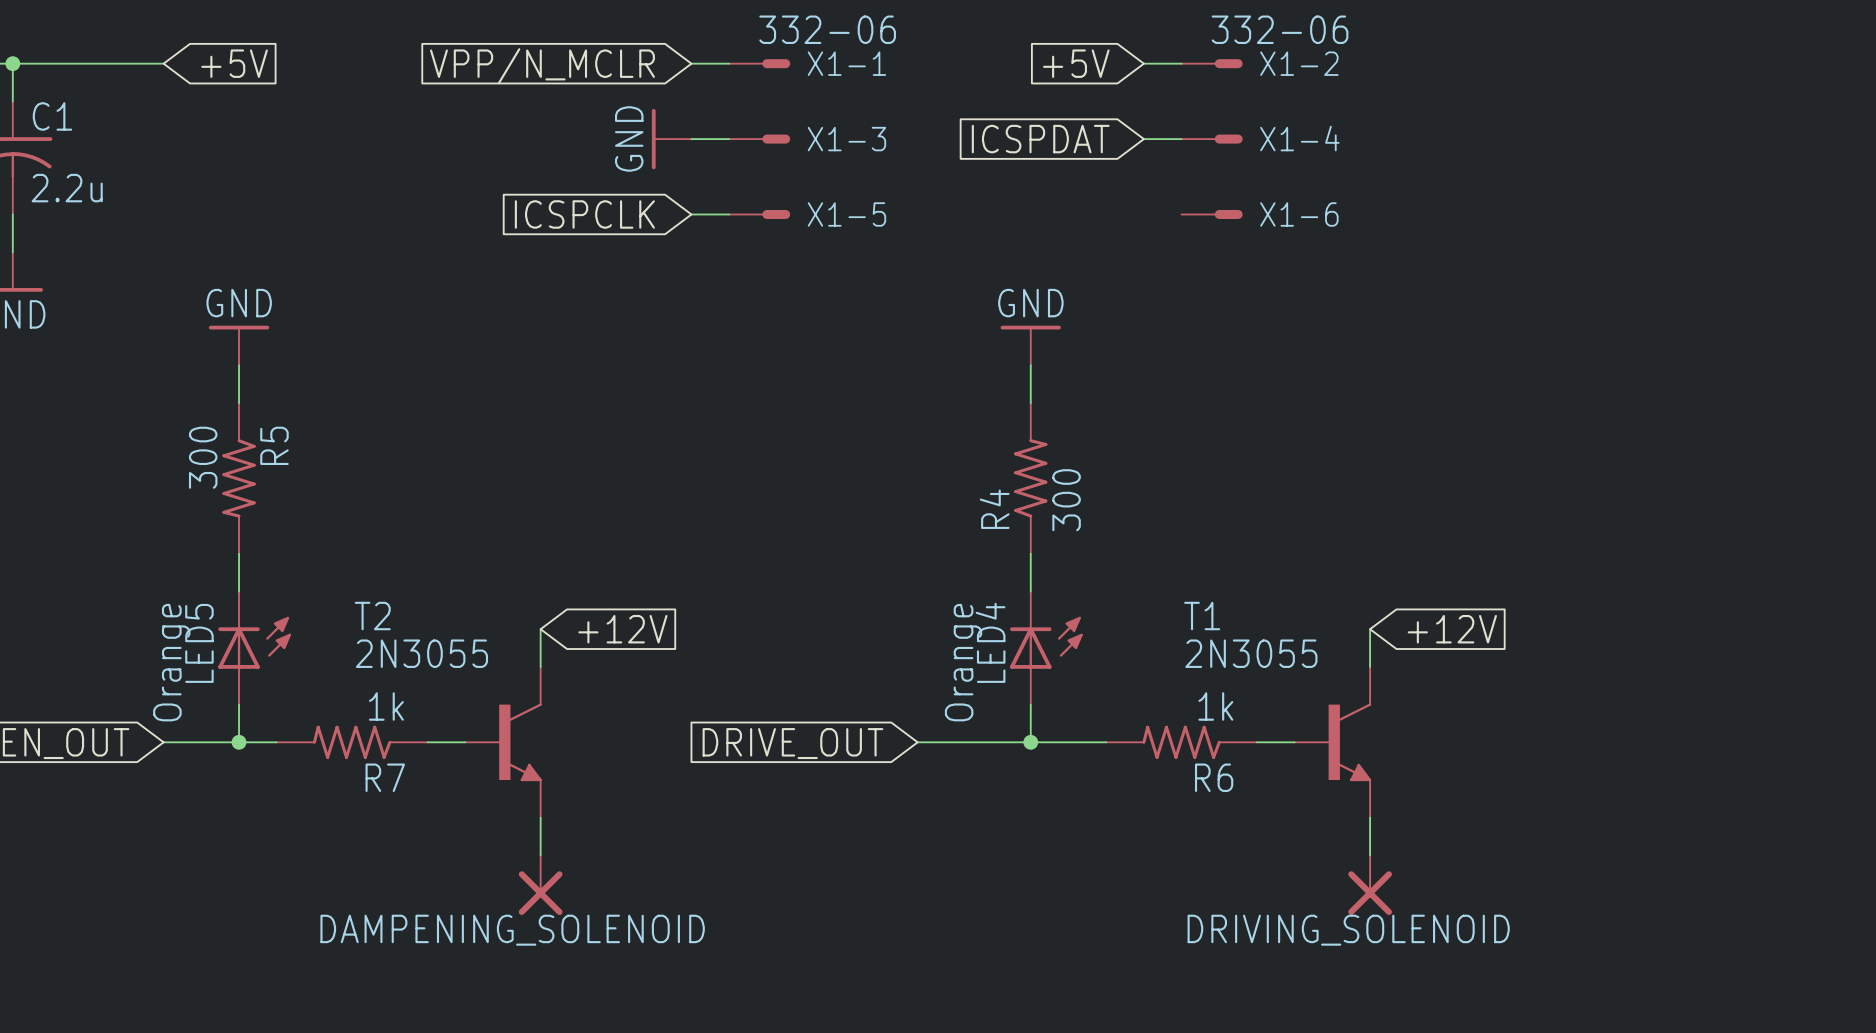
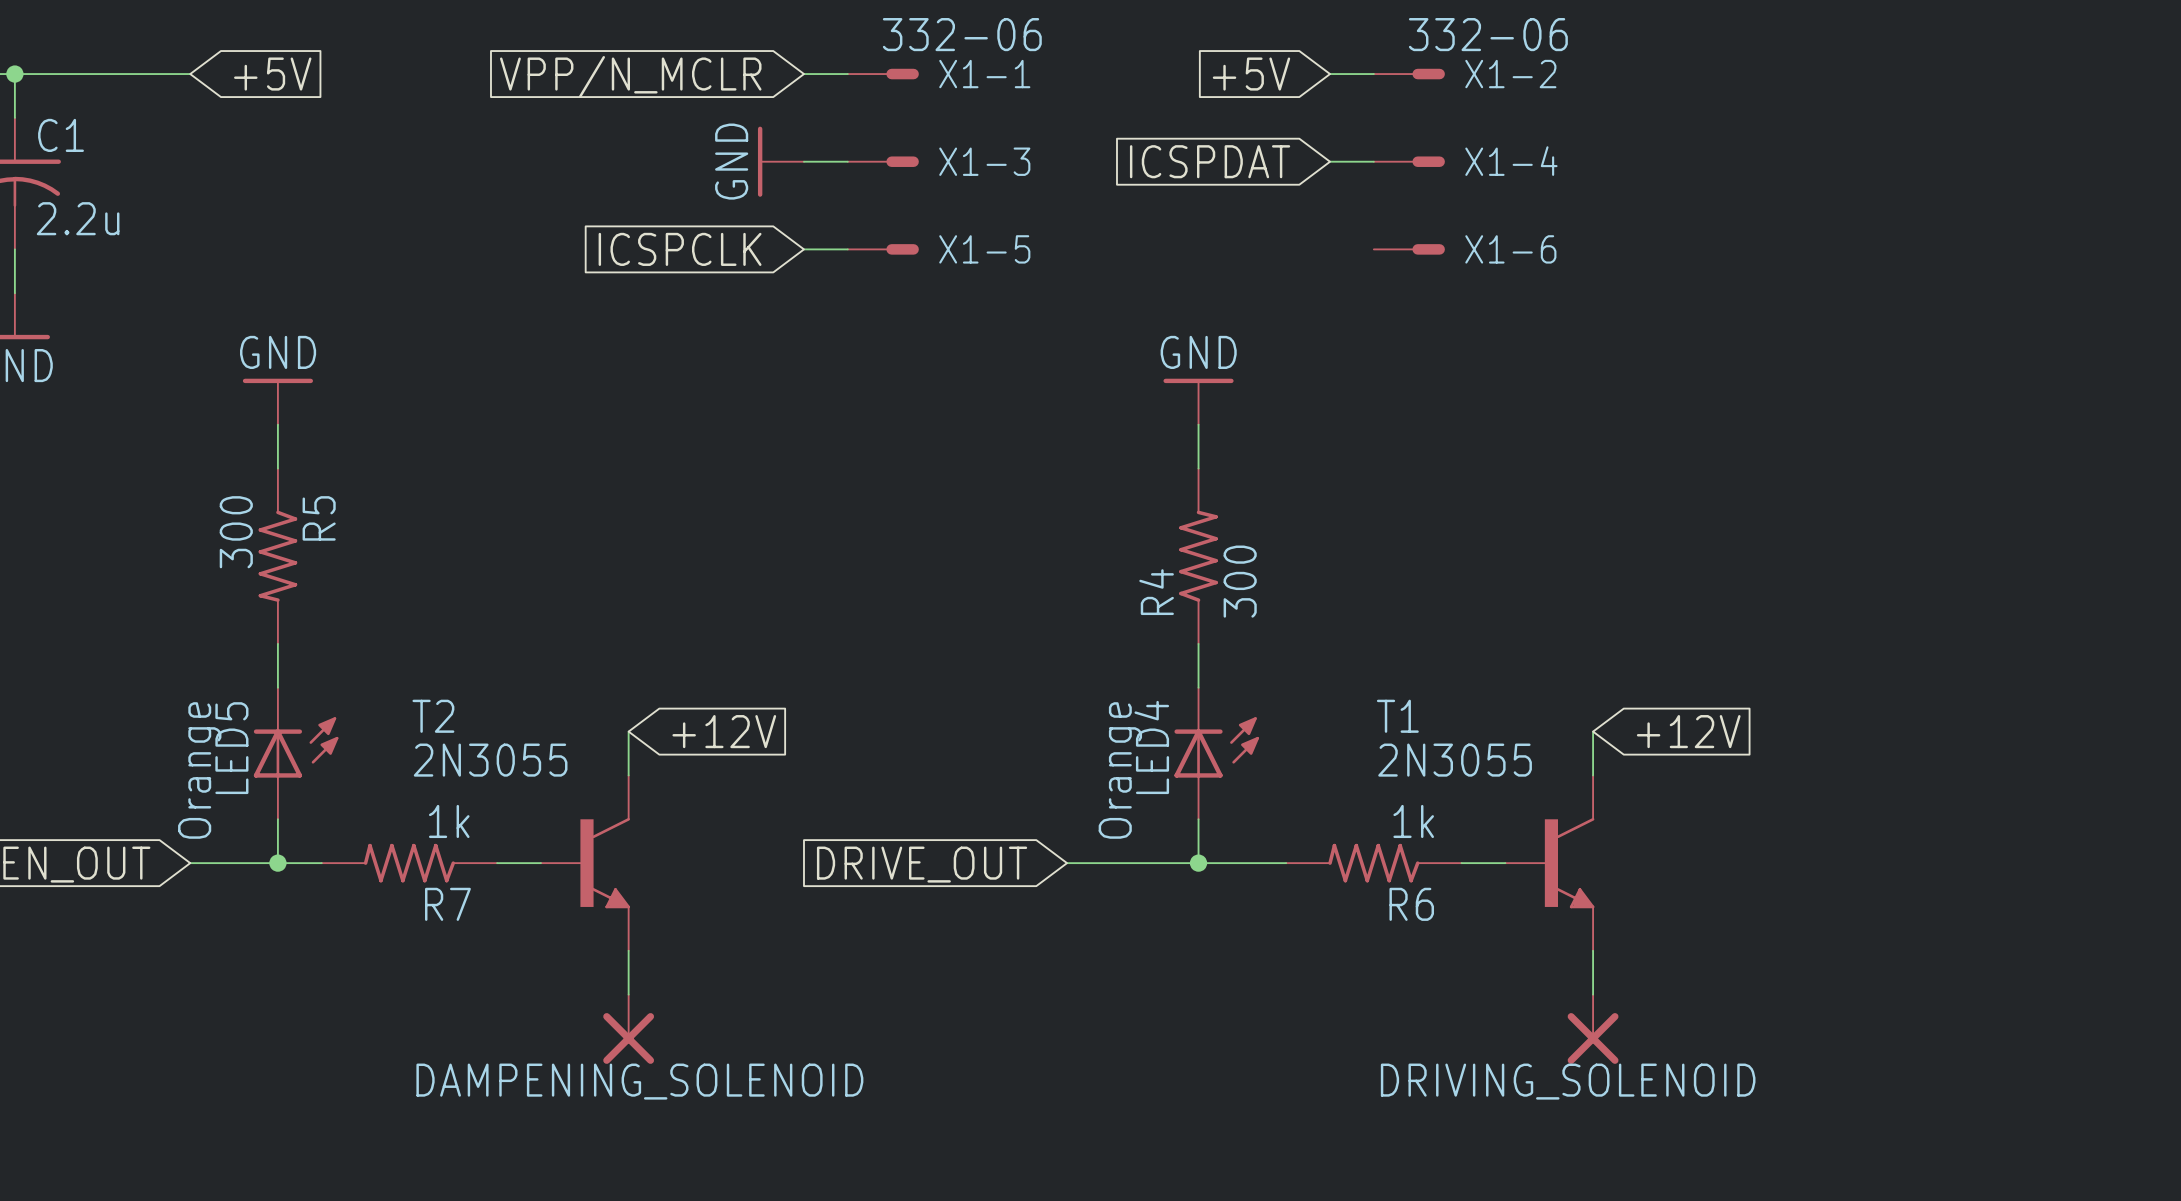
DAMPENING_SOLENOID name position: DAMPENING_SOLENOID (512, 930) -> DAMPENING_SOLENOID (639, 1081)

